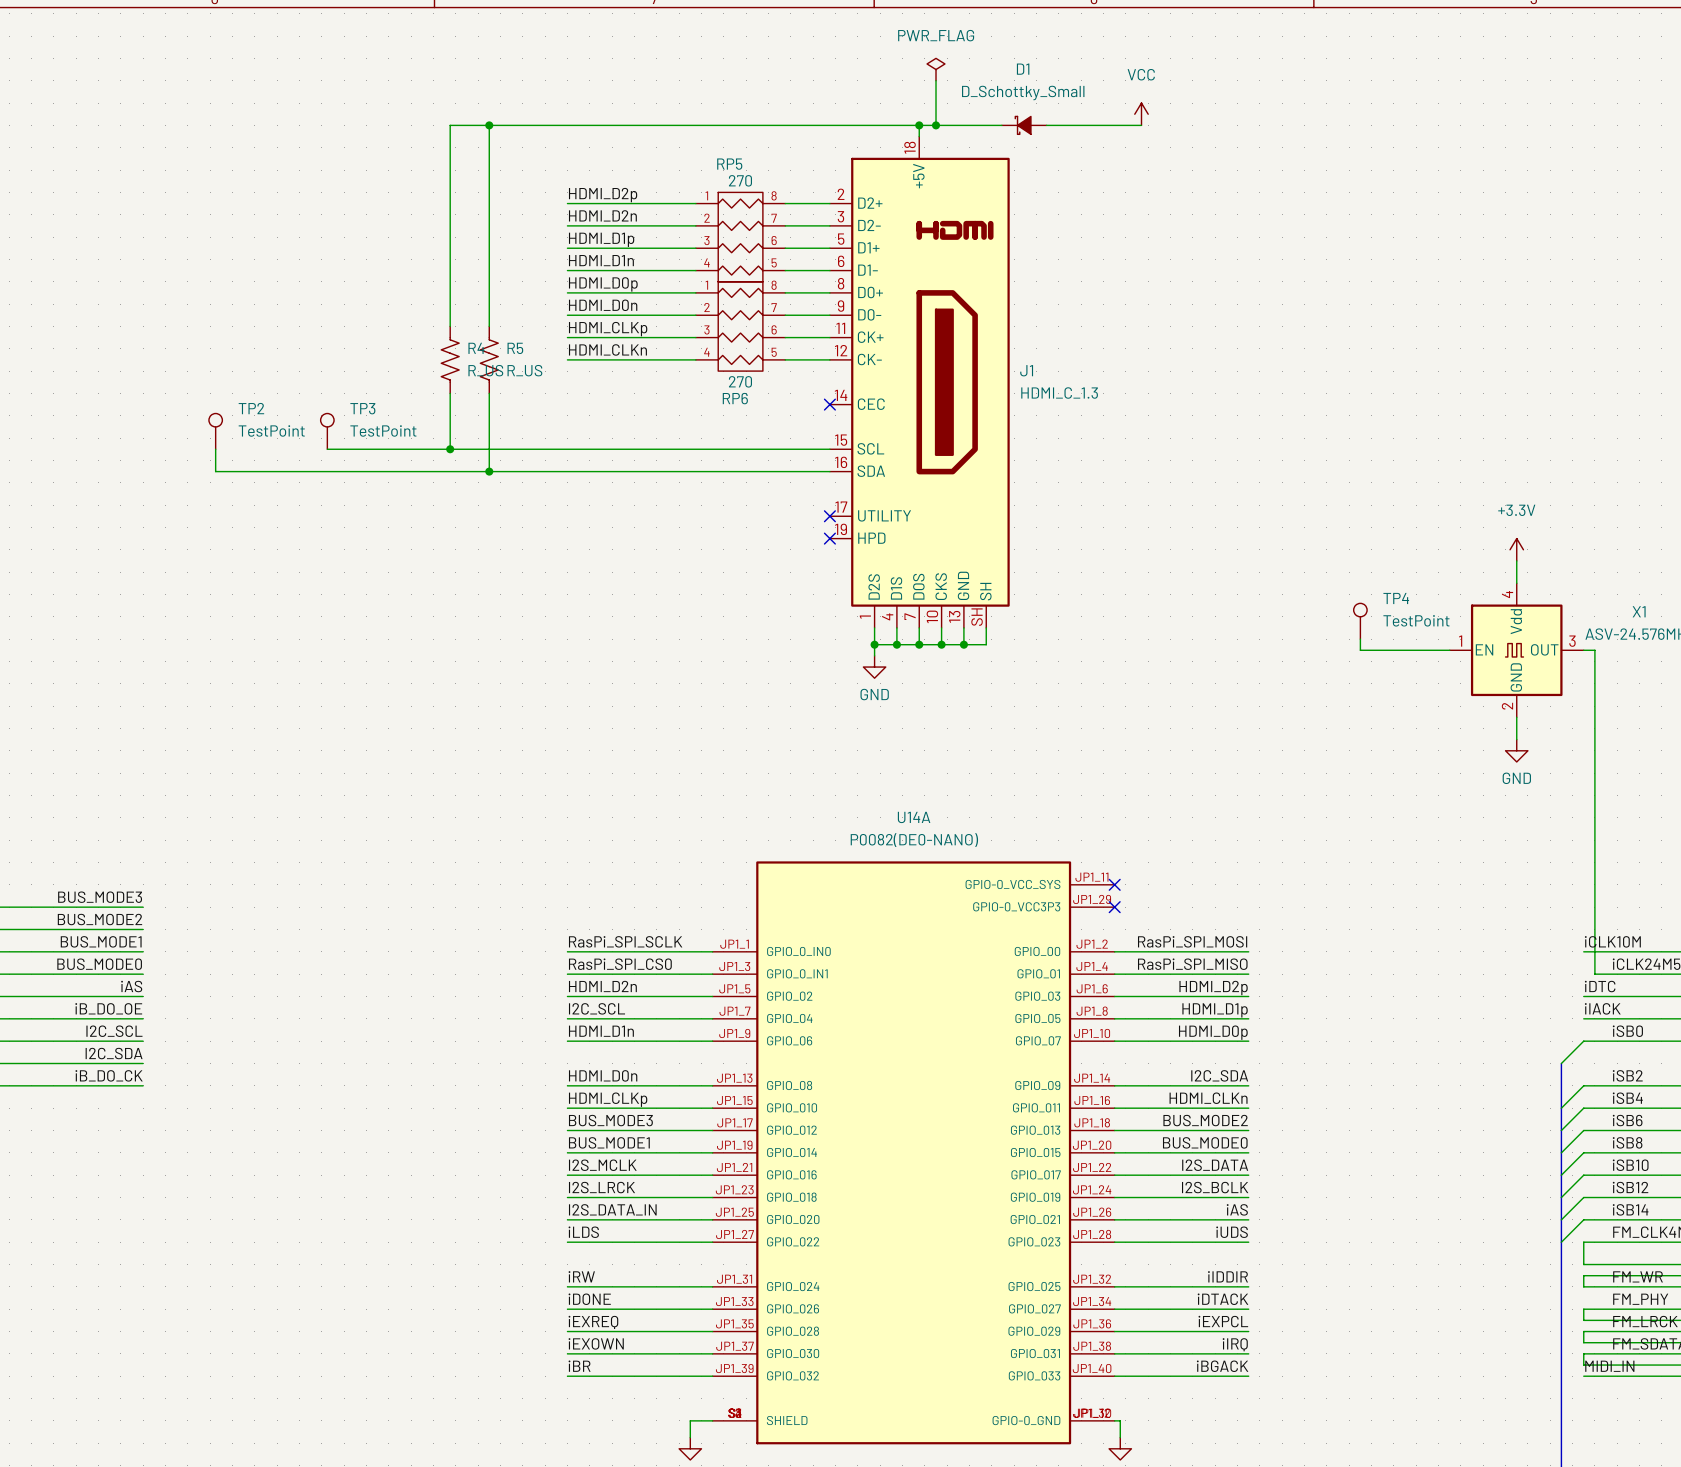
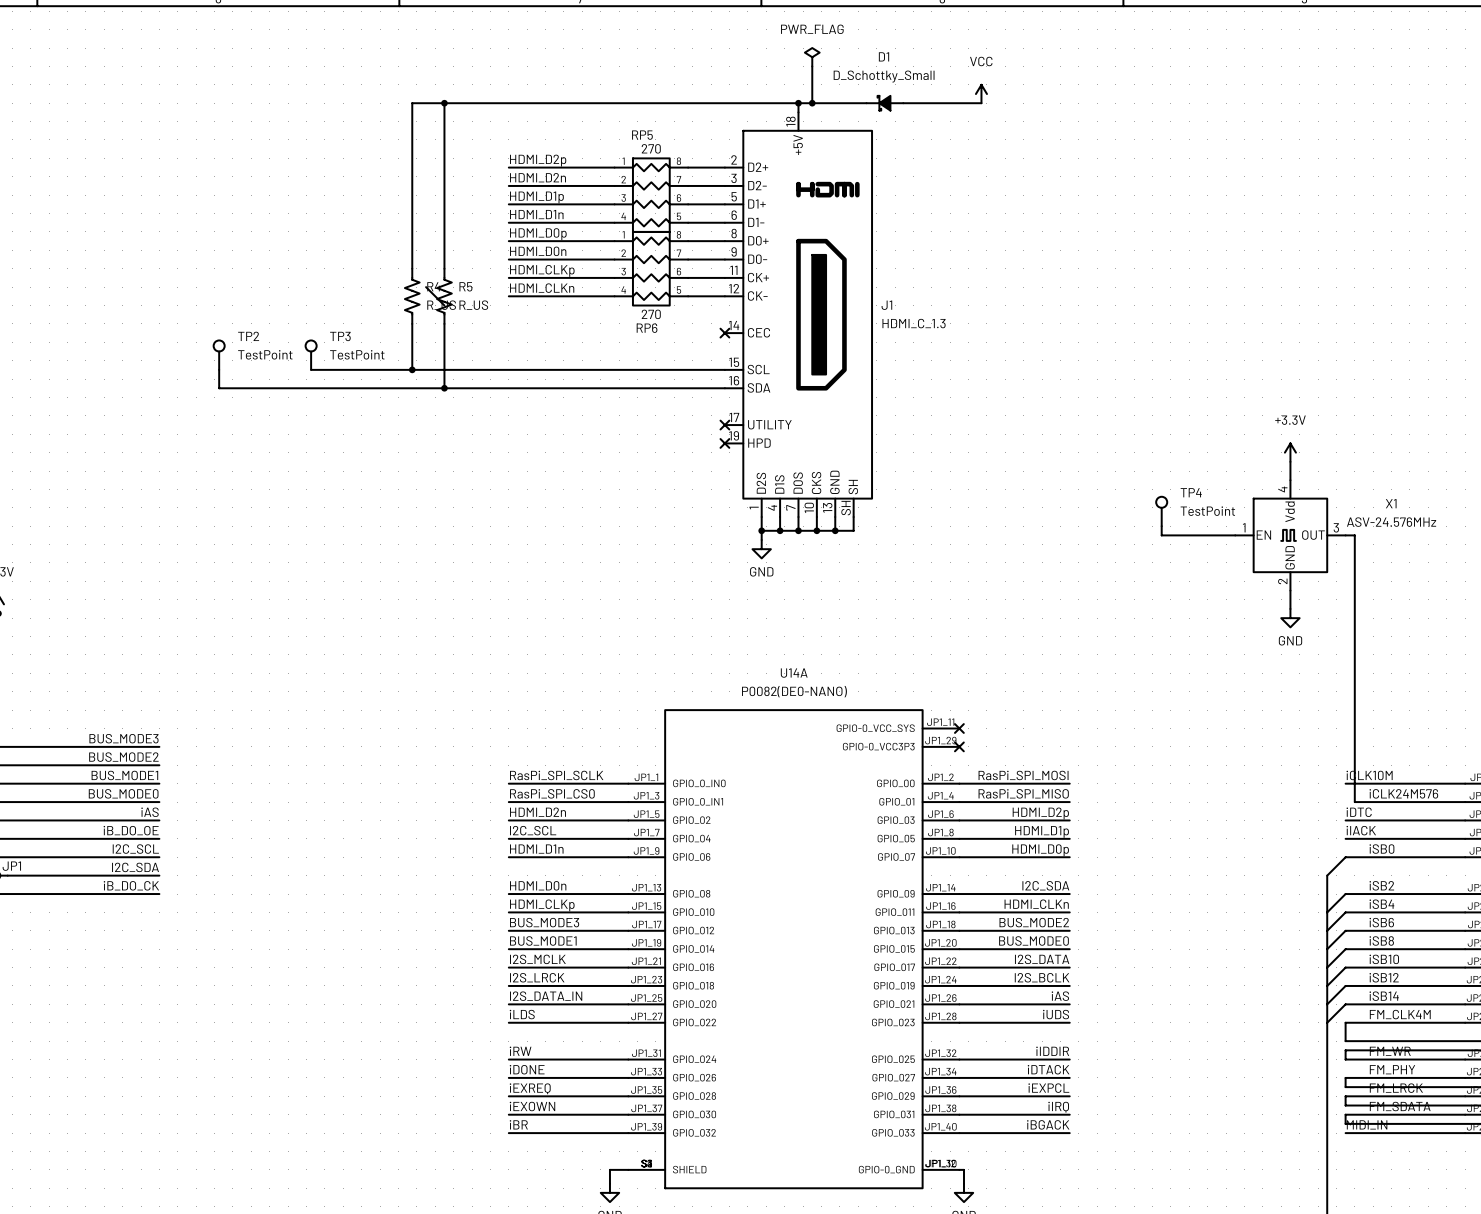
wire: none -> (426, 287) (444, 305)

